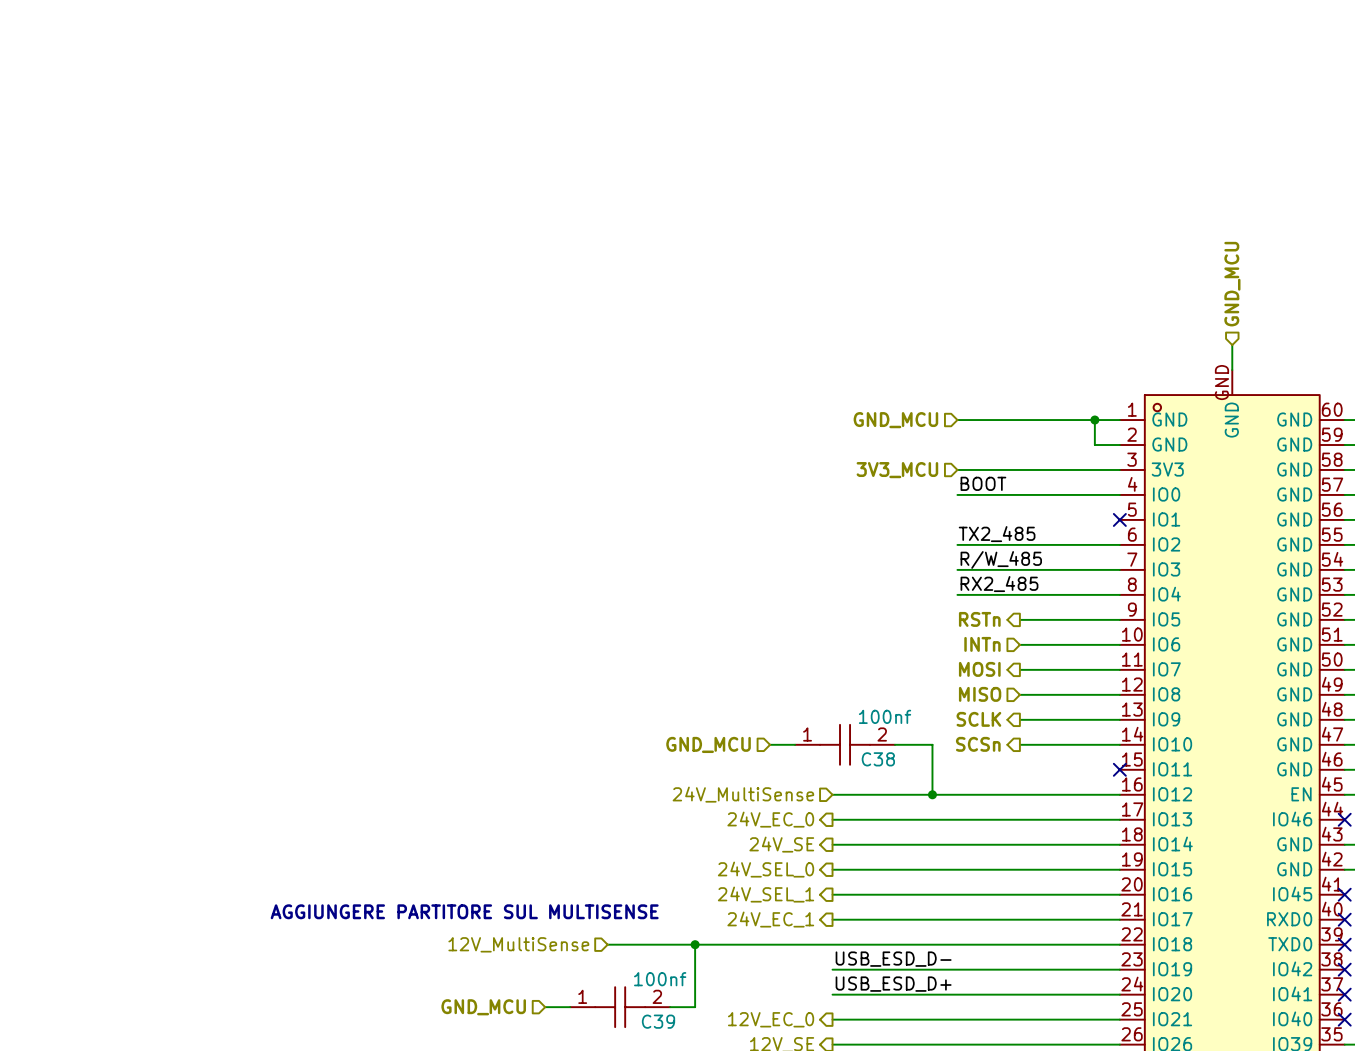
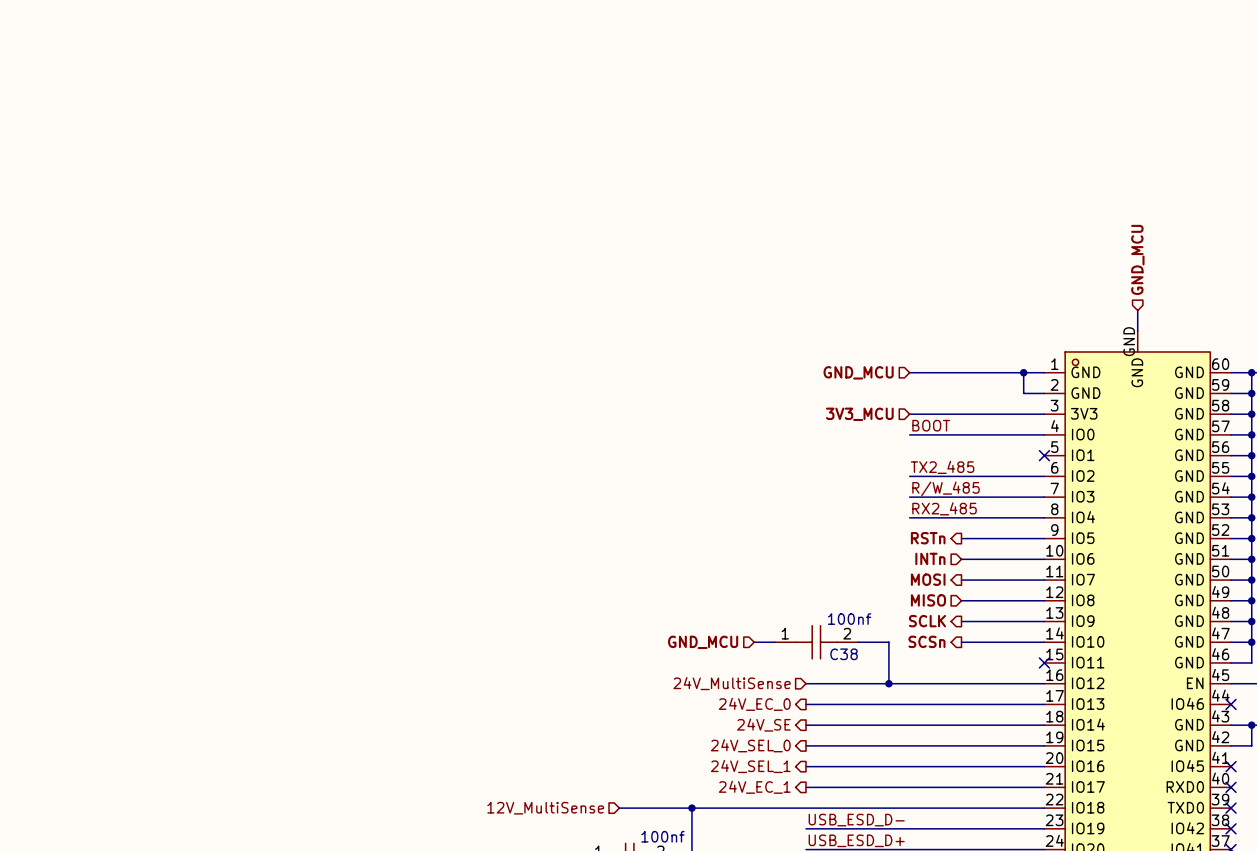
text: AGGIUNGERE PARTITORE SUL MULTISENSE (464, 911) -> none

